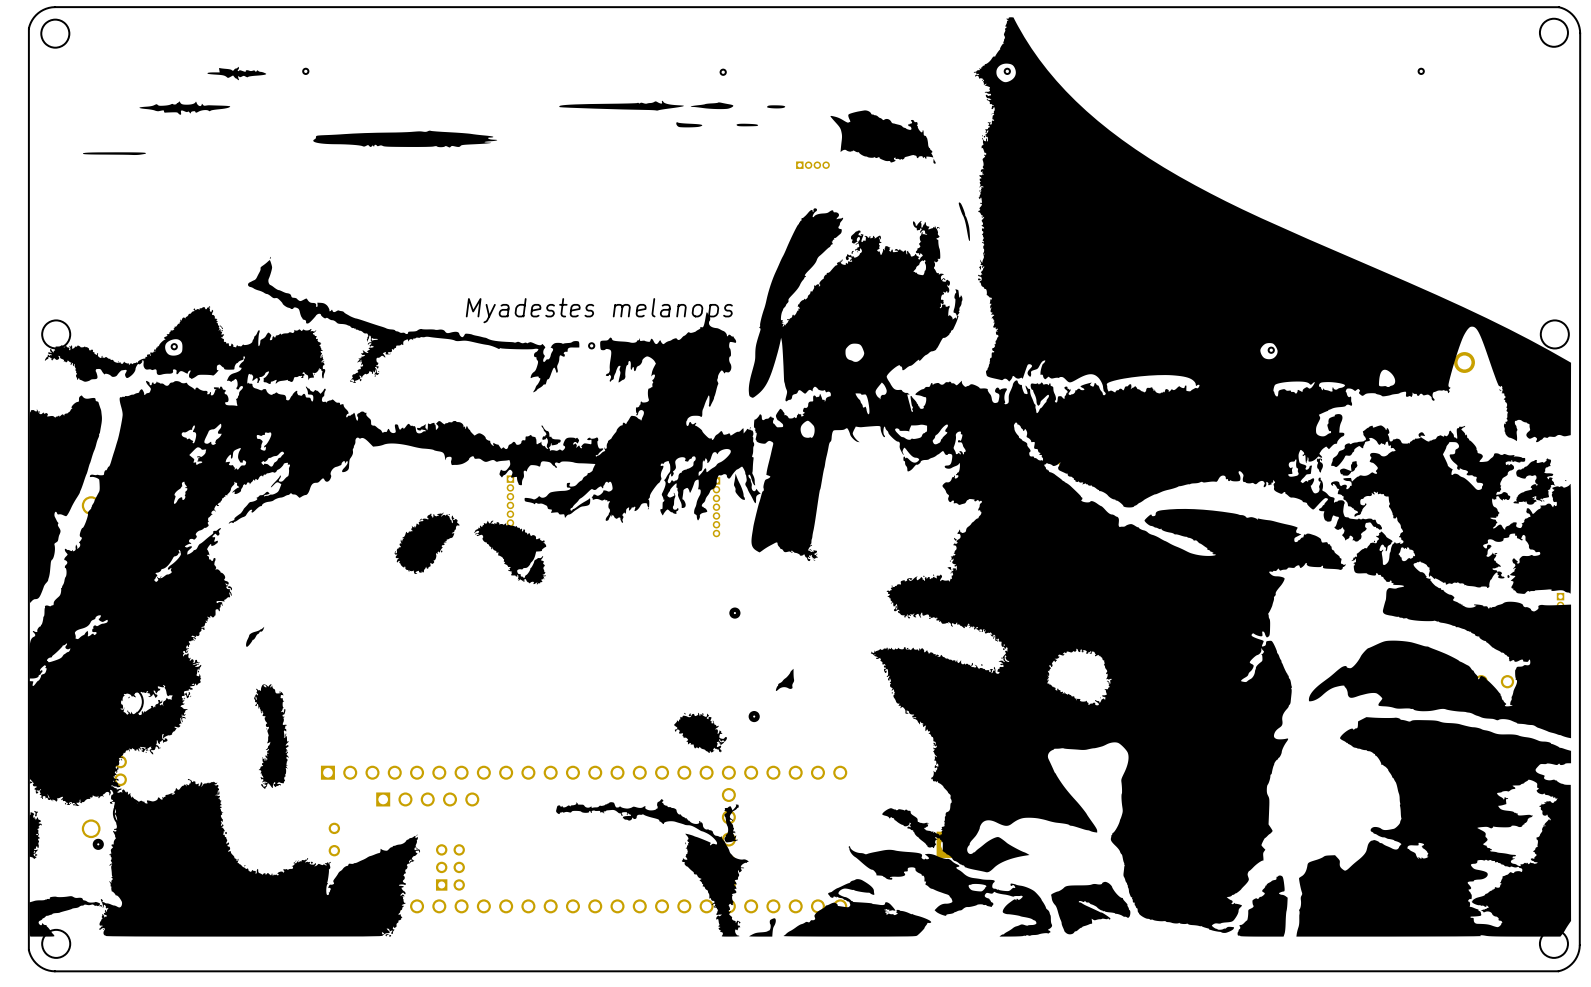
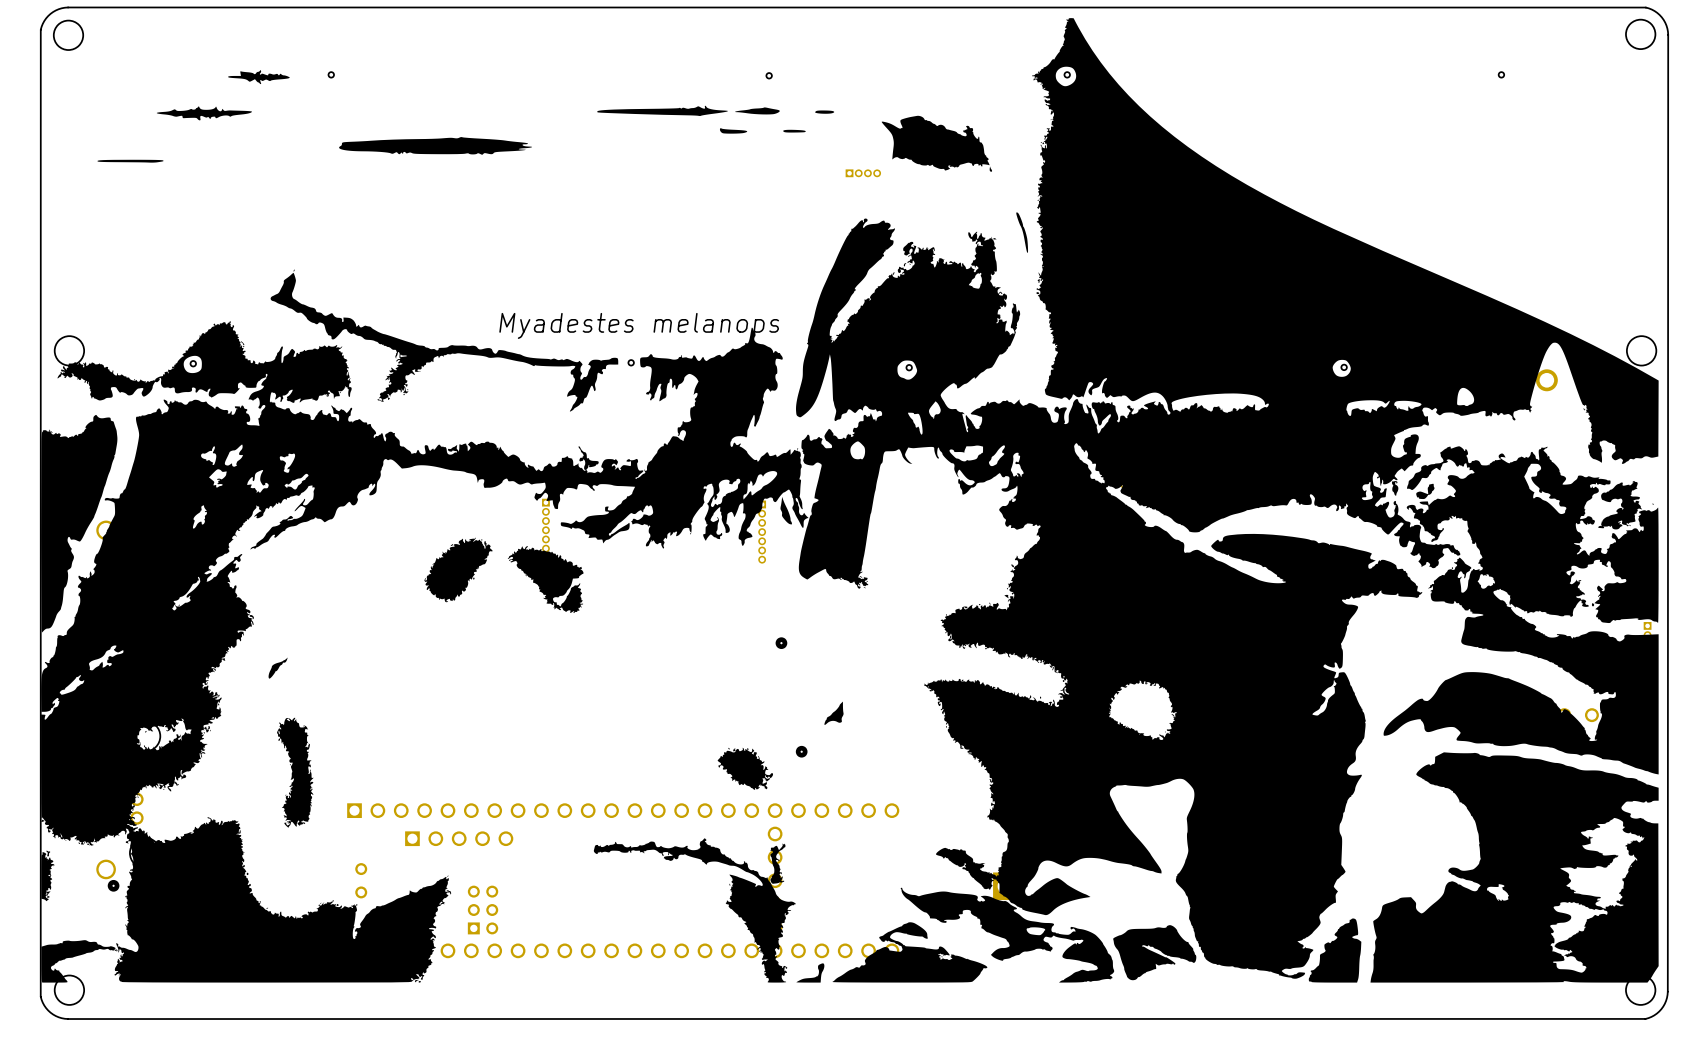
part: none -> (909, 367)

